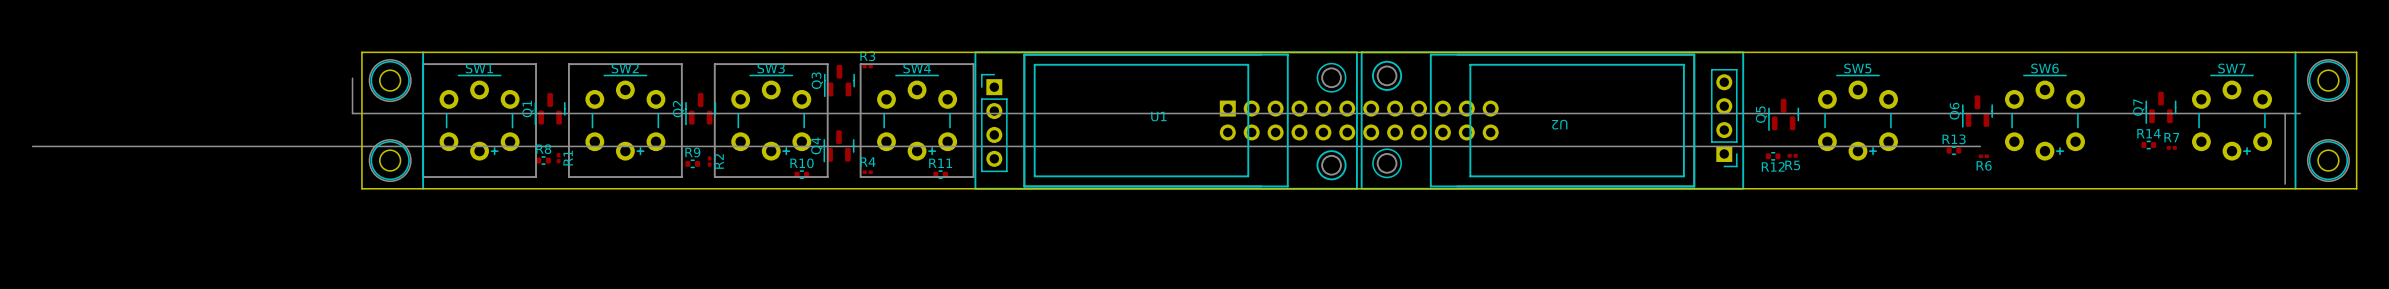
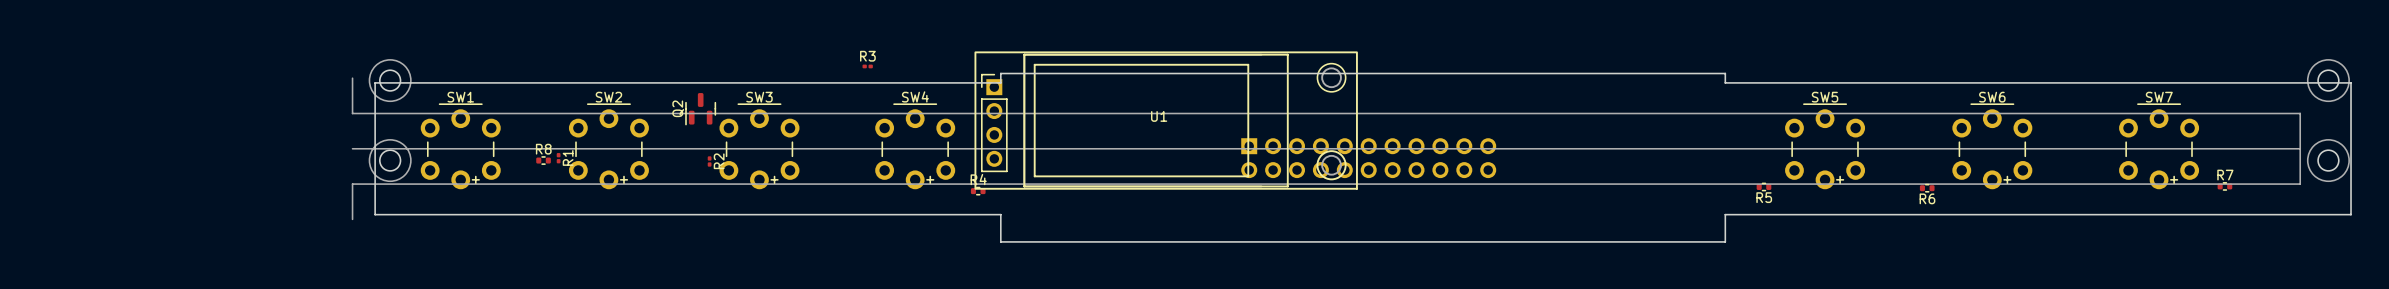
board edge: (361, 52) (361, 188) (2356, 188) (2356, 52) (361, 52) -> (1000, 73) (1000, 82) (375, 82) (375, 214) (1000, 214) (1000, 241) (1725, 241) (1725, 214) (2351, 214) (2351, 82) (1725, 82) (1725, 73) (1000, 73)
line: (423, 52) (423, 188) -> none
line: (2295, 52) (2295, 188) -> none
drawing: [370, 61, 410, 101] -> none
drawing: [2308, 61, 2348, 101] -> none
line: (423, 64) (536, 64) (536, 177) (423, 177) (423, 64) -> none
line: (568, 64) (681, 64) (681, 177) (568, 177) (568, 64) -> none
line: (714, 64) (827, 64) (827, 177) (714, 177) (714, 64) -> none
line: (860, 64) (973, 64) (973, 177) (860, 177) (860, 64) -> none
Q3: (839, 80) -> none
Q7: (2160, 107) -> none
Q1: (550, 109) -> none
Q6: (1977, 111) -> none
line: (2285, 113) (2285, 184) -> none
line: none -> (2300, 113) (2300, 184) (352, 184) (352, 219)
Q5: (1783, 114) -> none
SW1 position: (479, 117) -> (460, 146)
SW2 position: (625, 117) -> (608, 146)
SW3 position: (771, 117) -> (759, 146)
SW4 position: (917, 117) -> (915, 146)
SW5 position: (1857, 117) -> (1825, 146)
SW6 position: (2044, 117) -> (1992, 146)
SW7 position: (2231, 117) -> (2159, 146)
part: (1359, 120) -> none
U2: (1552, 120) -> none
drawing: [370, 141, 410, 181] -> none
drawing: [2308, 141, 2348, 181] -> none
R14: (2148, 145) -> none
R7 footprint: [2166, 145, 2177, 150] -> [2217, 182, 2233, 191]
line: (32, 146) (1980, 146) -> none
Q4: (838, 146) -> none
line: none -> (352, 148) (2300, 148)
R13: (1953, 150) -> none
R5 footprint: [1787, 153, 1798, 158] -> [1756, 182, 1772, 192]
R6 footprint: [1978, 154, 1990, 159] -> [1919, 184, 1935, 193]
R12: (1773, 156) -> none
part: none -> (1368, 158)
R9: (692, 163) -> none
R4 footprint: [862, 170, 873, 175] -> [970, 186, 986, 196]
R10: (801, 174) -> none
R11: (940, 174) -> none

